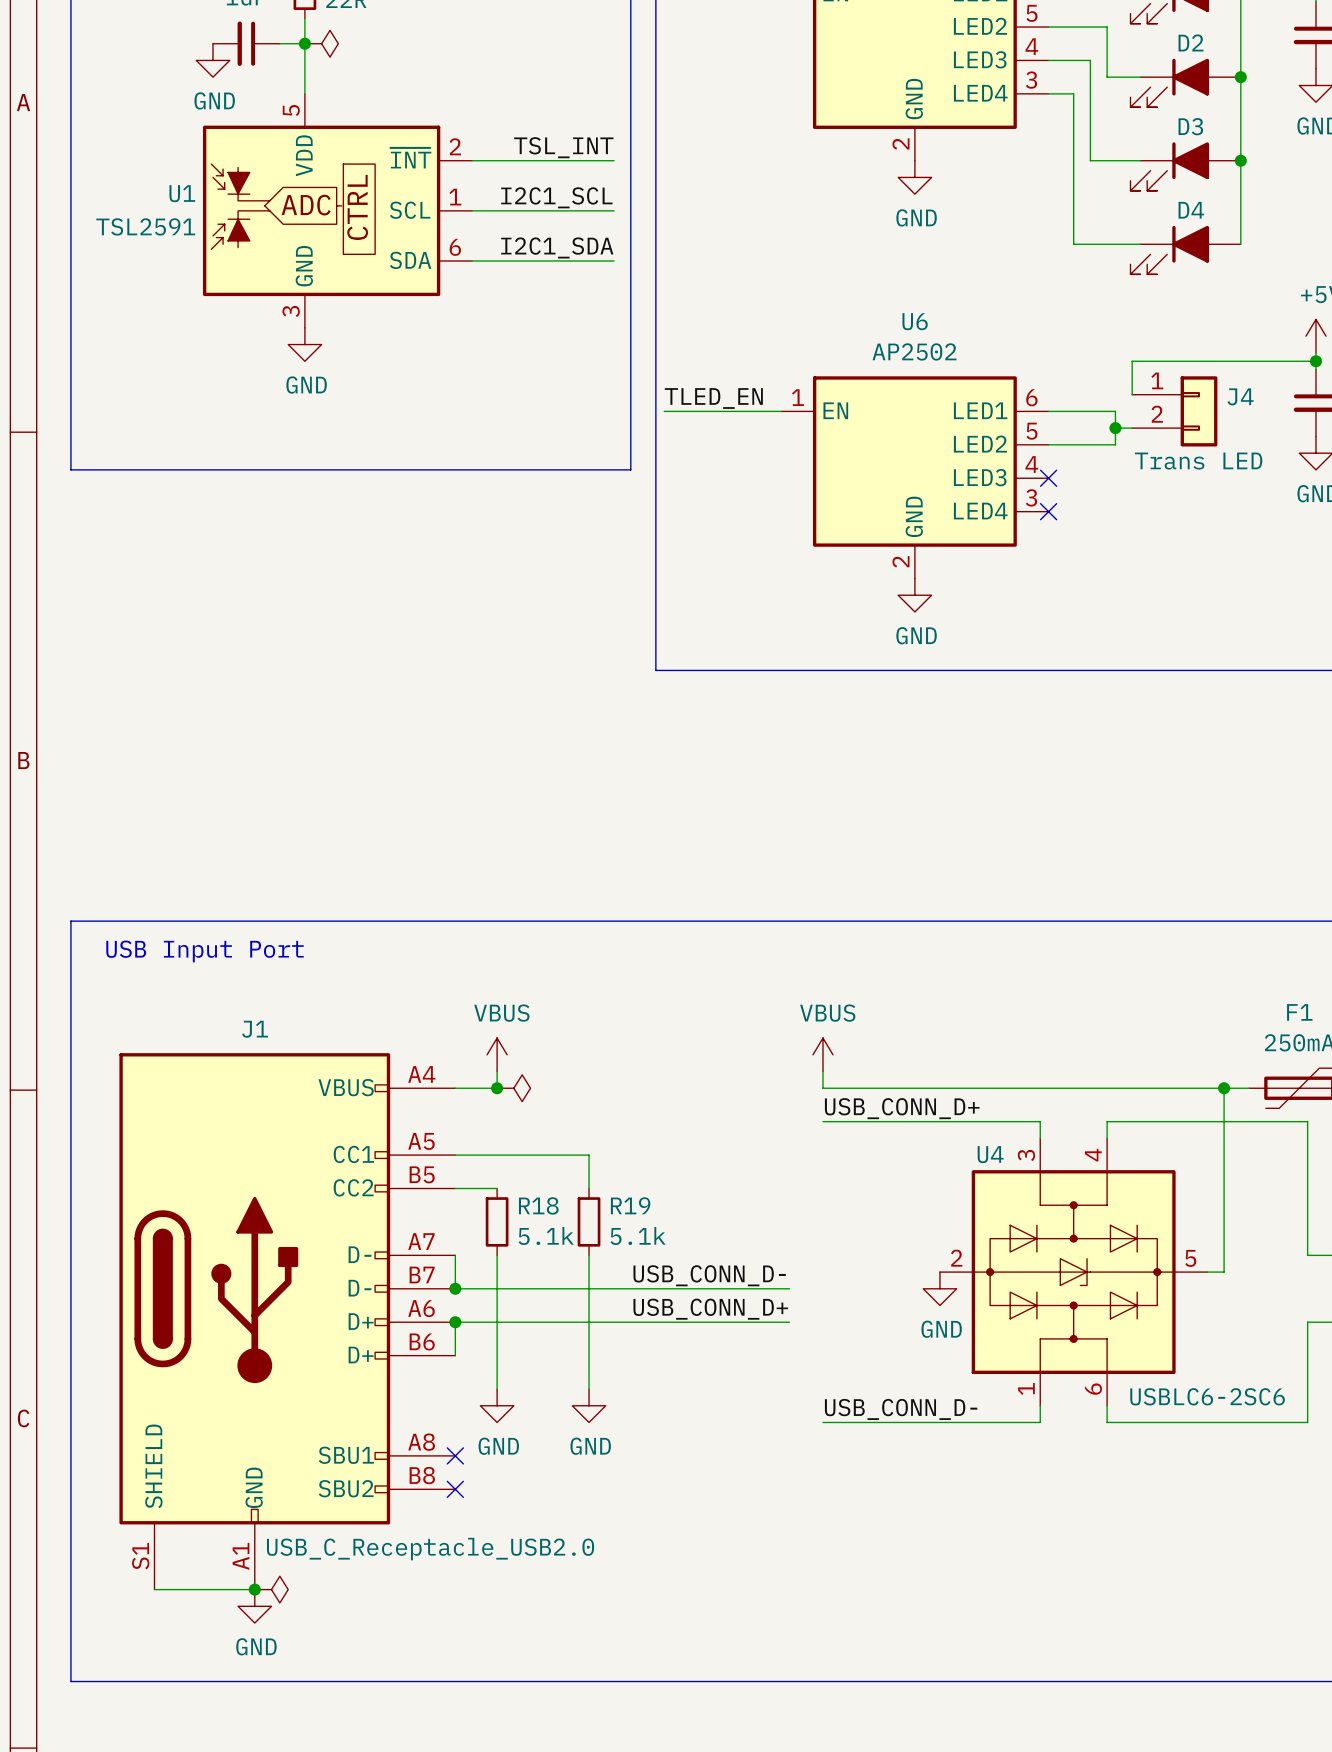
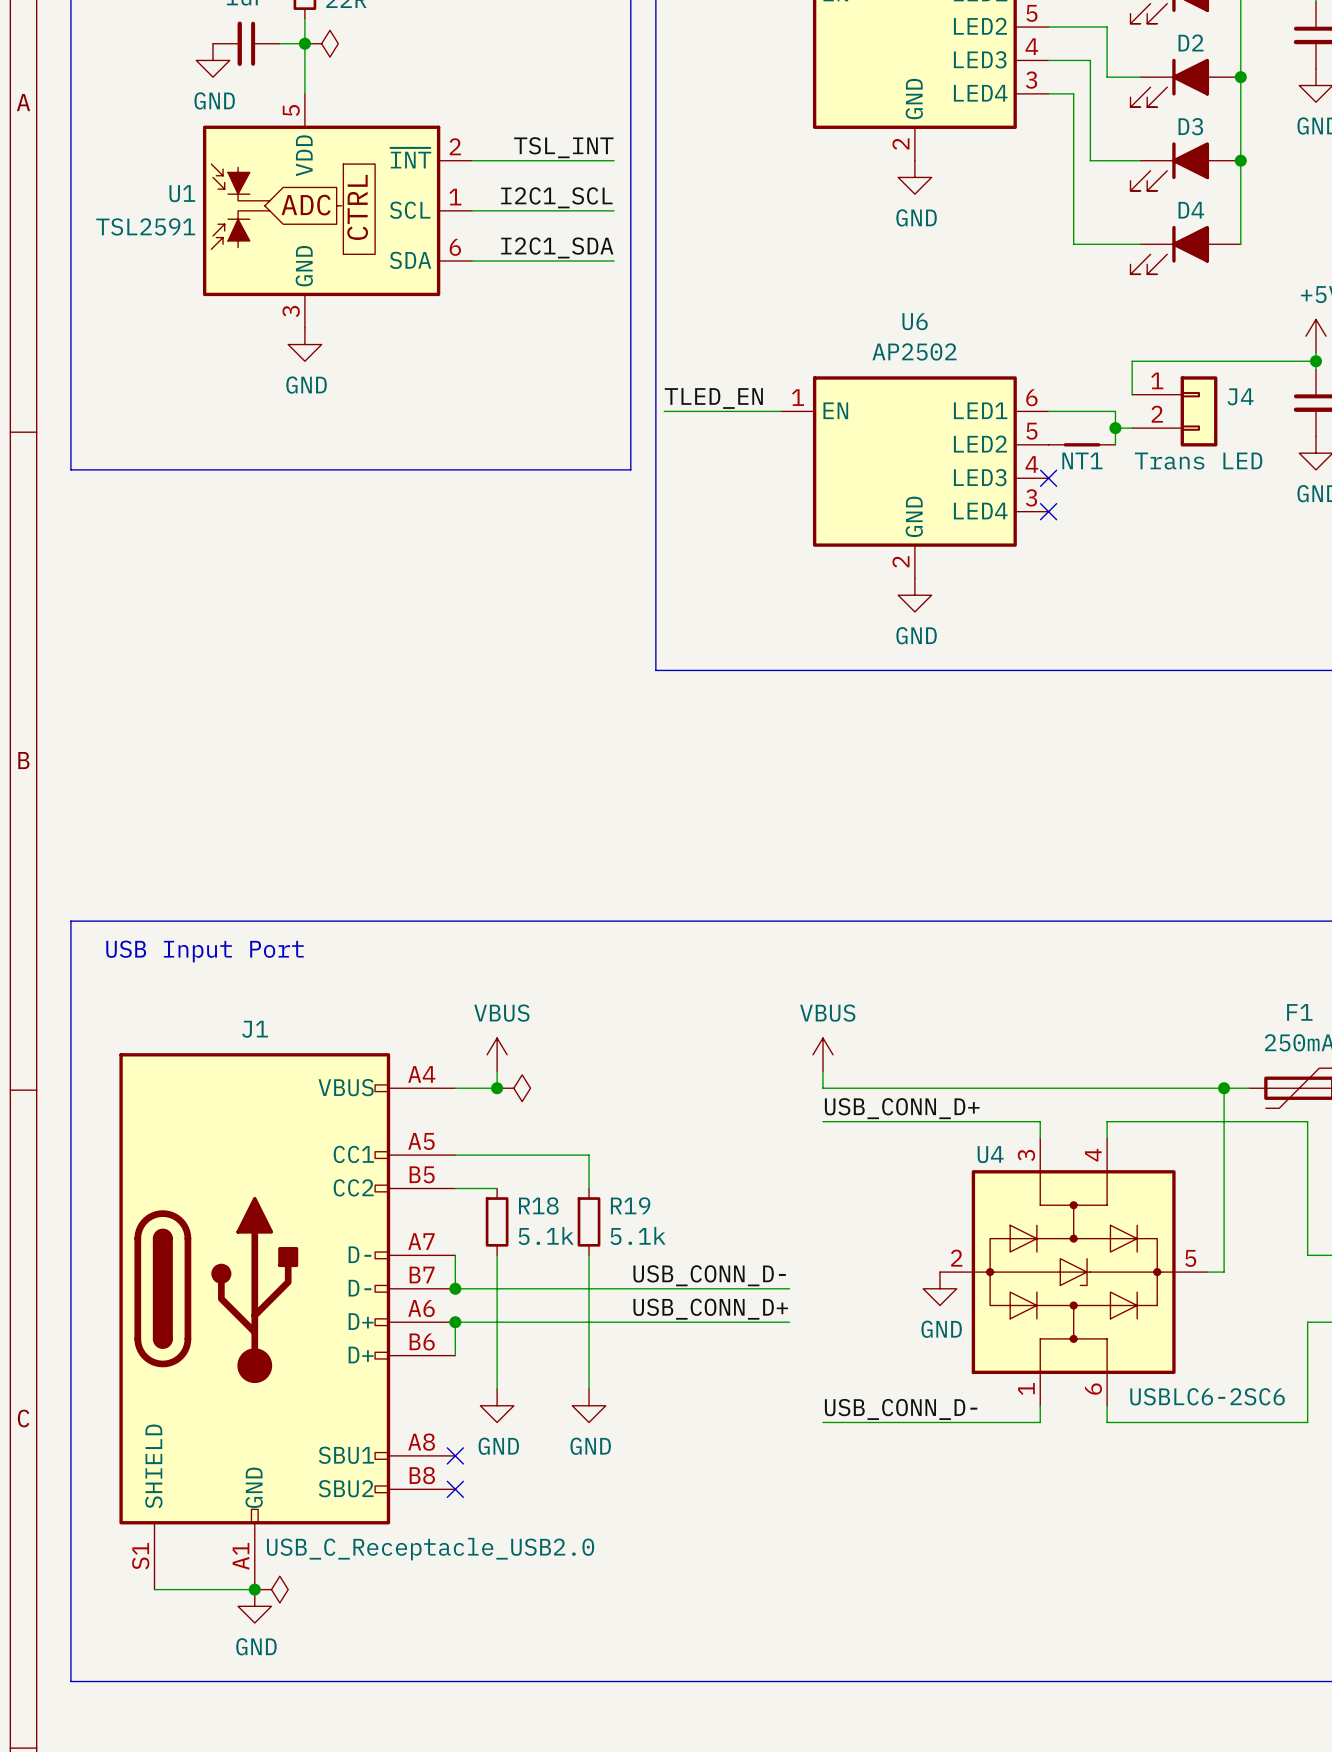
NT1: none -> (1082, 444)

